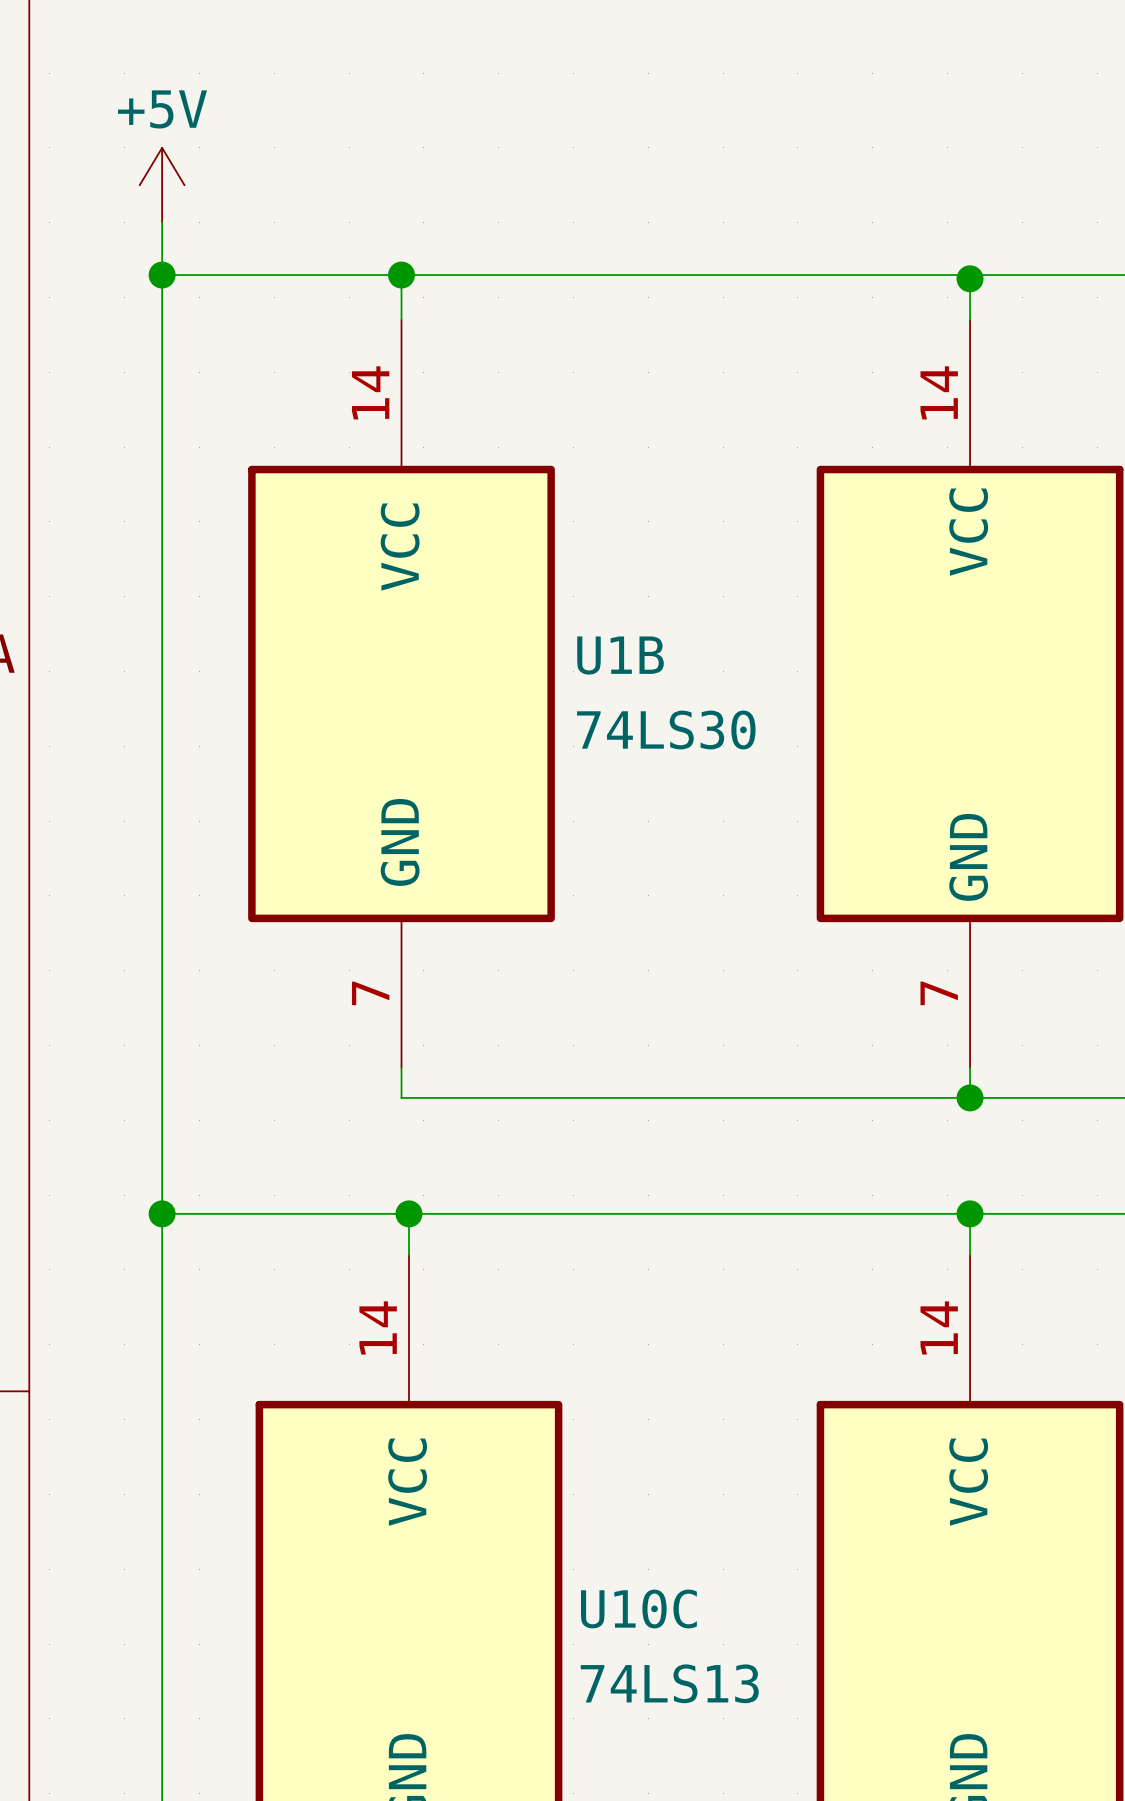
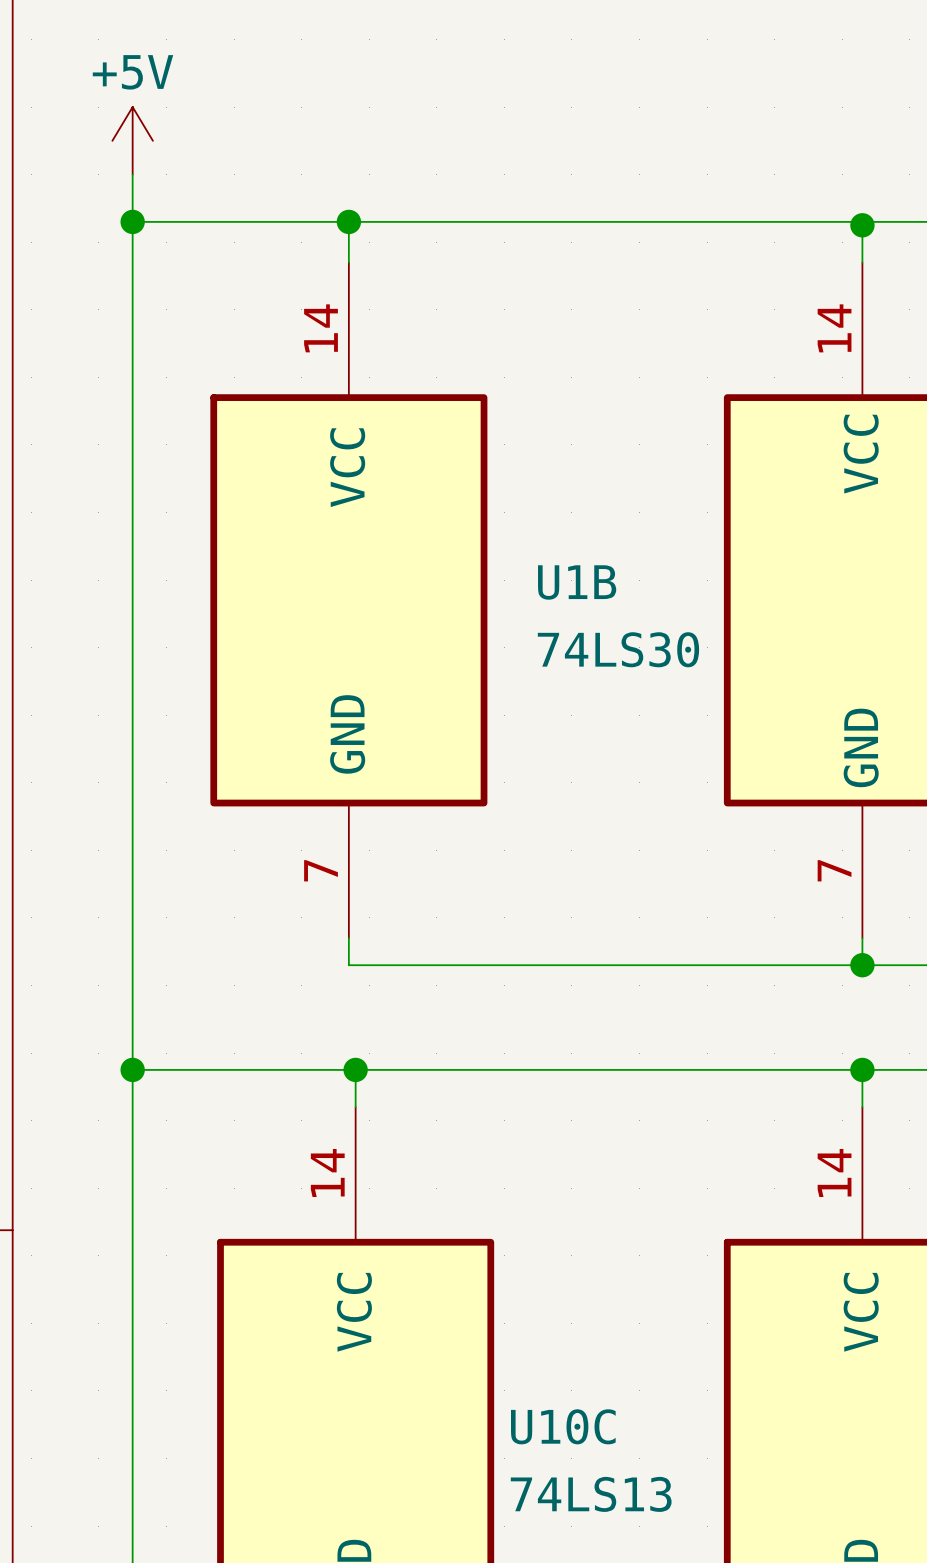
U1B name position: U1B (620, 655) -> U1B (577, 582)
U1B value position: 74LS30 (666, 729) -> 74LS30 (618, 649)

